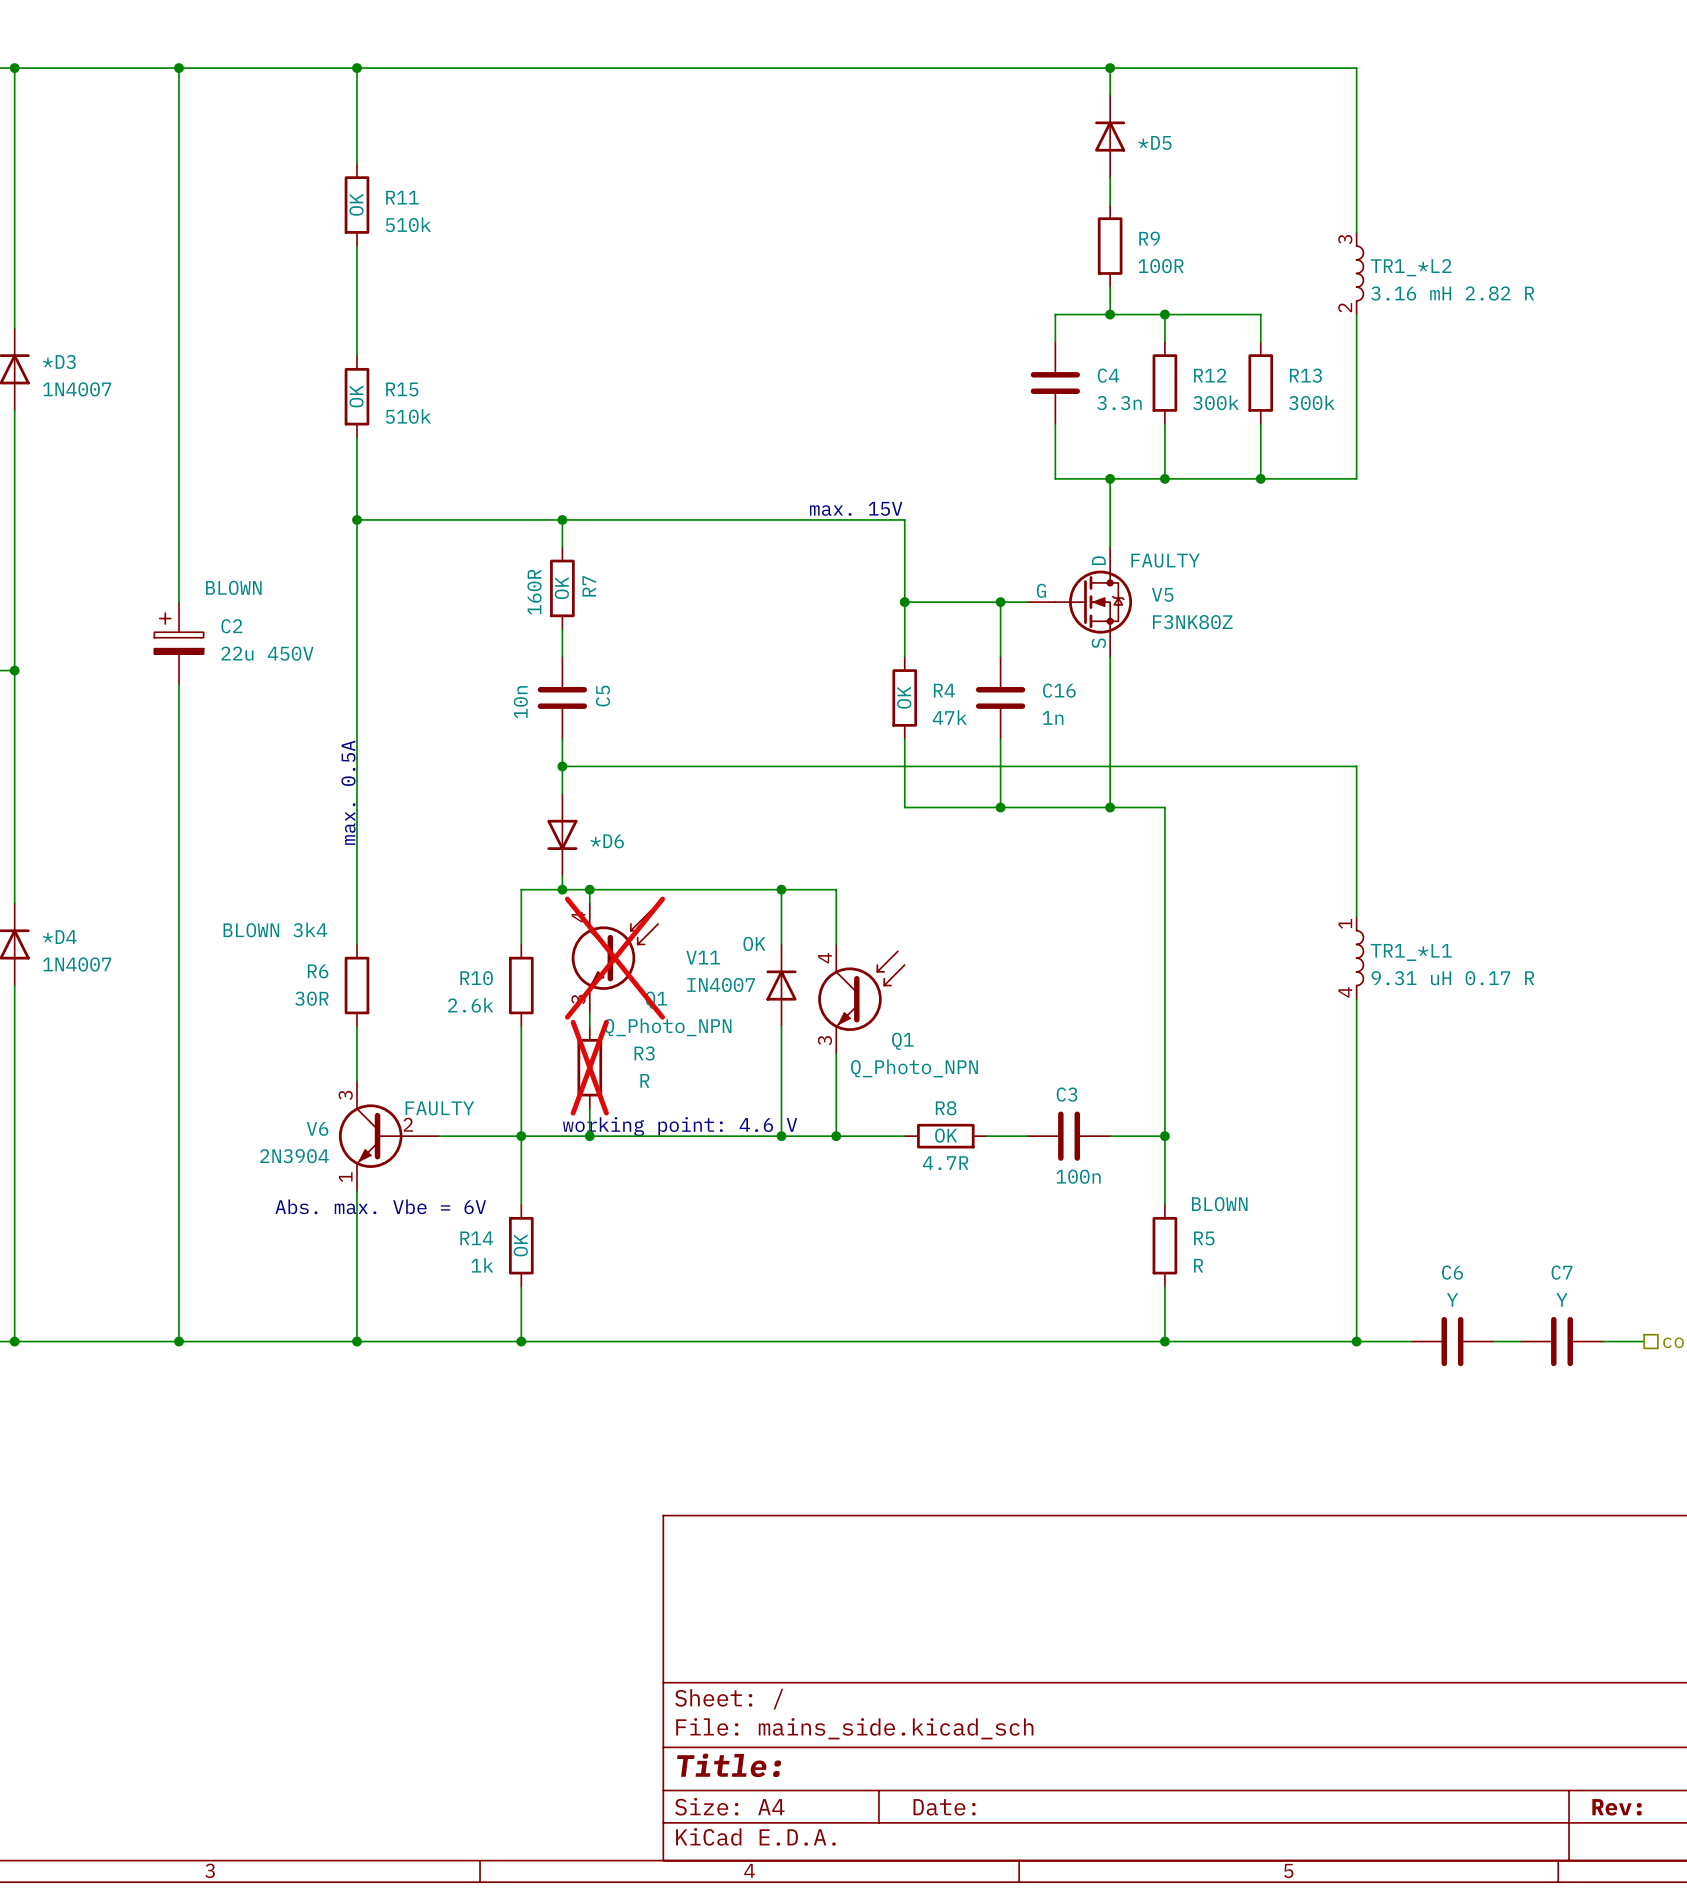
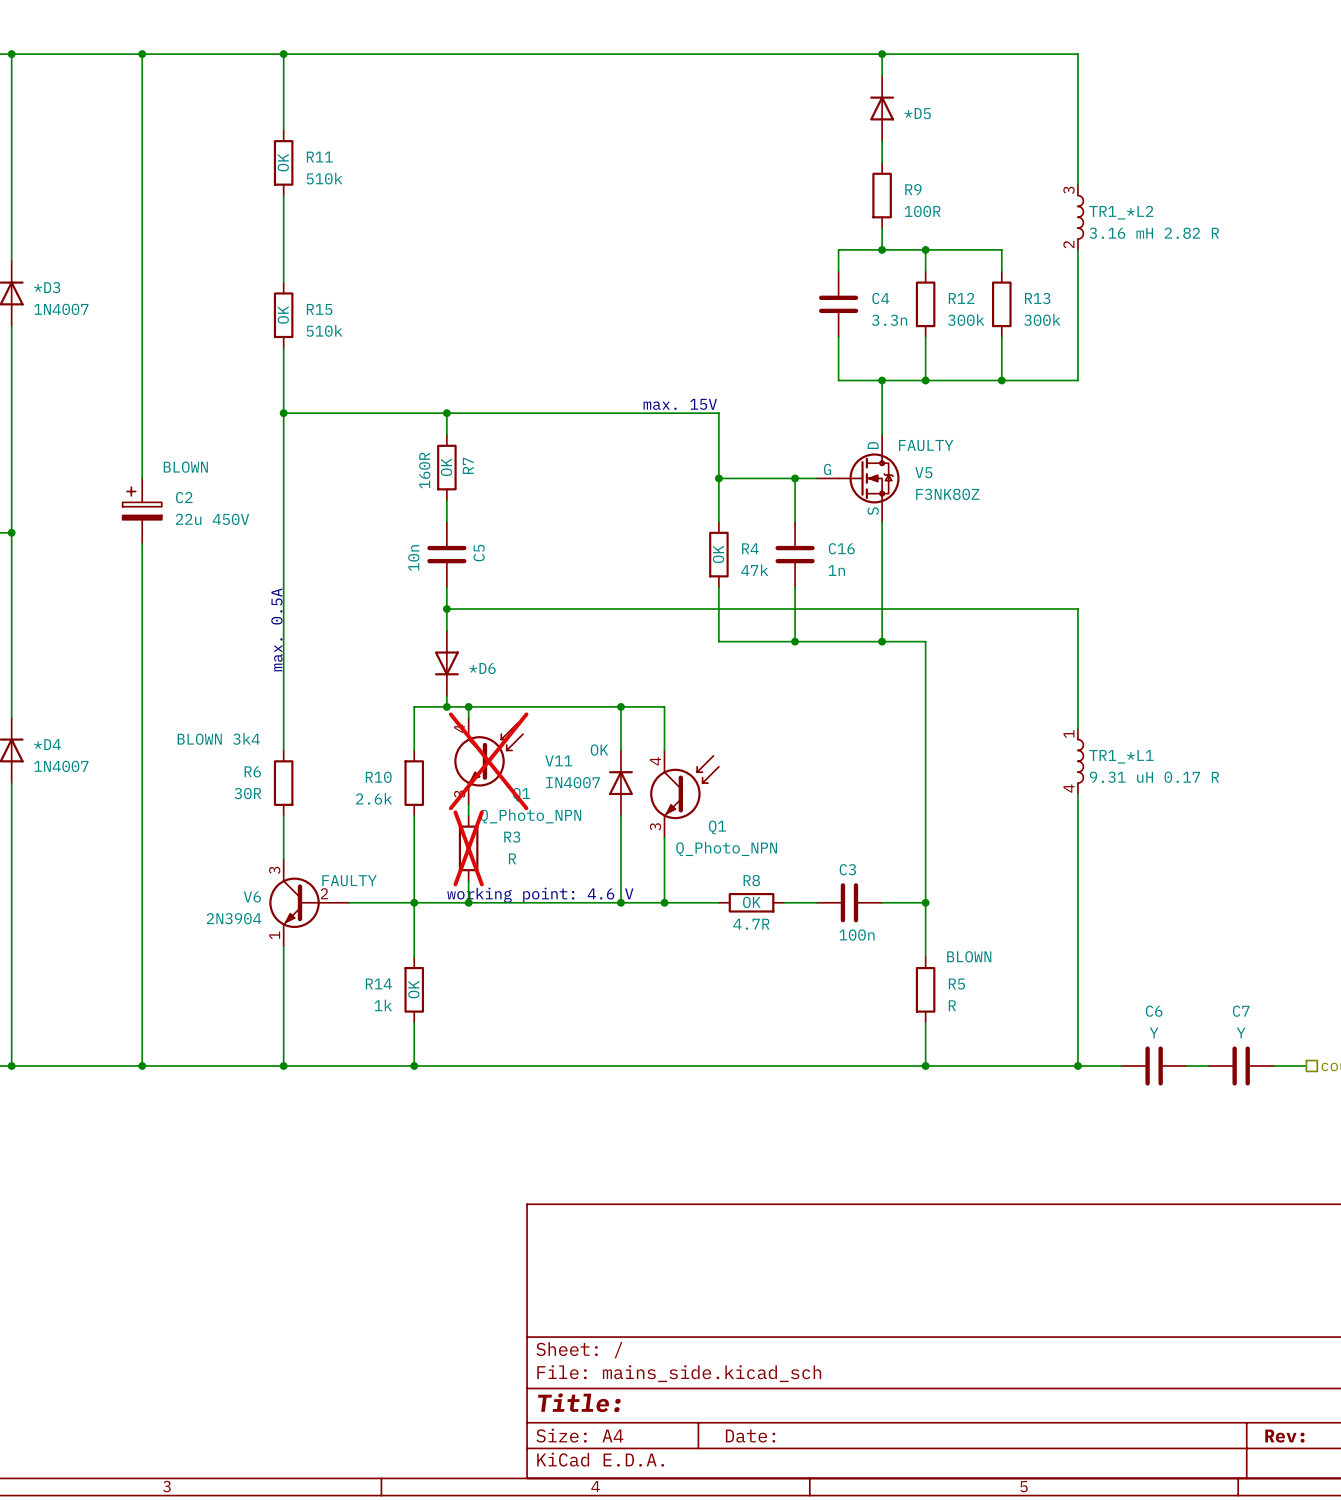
text: Abs. max. Vbe = 6V (380, 1206) -> none

